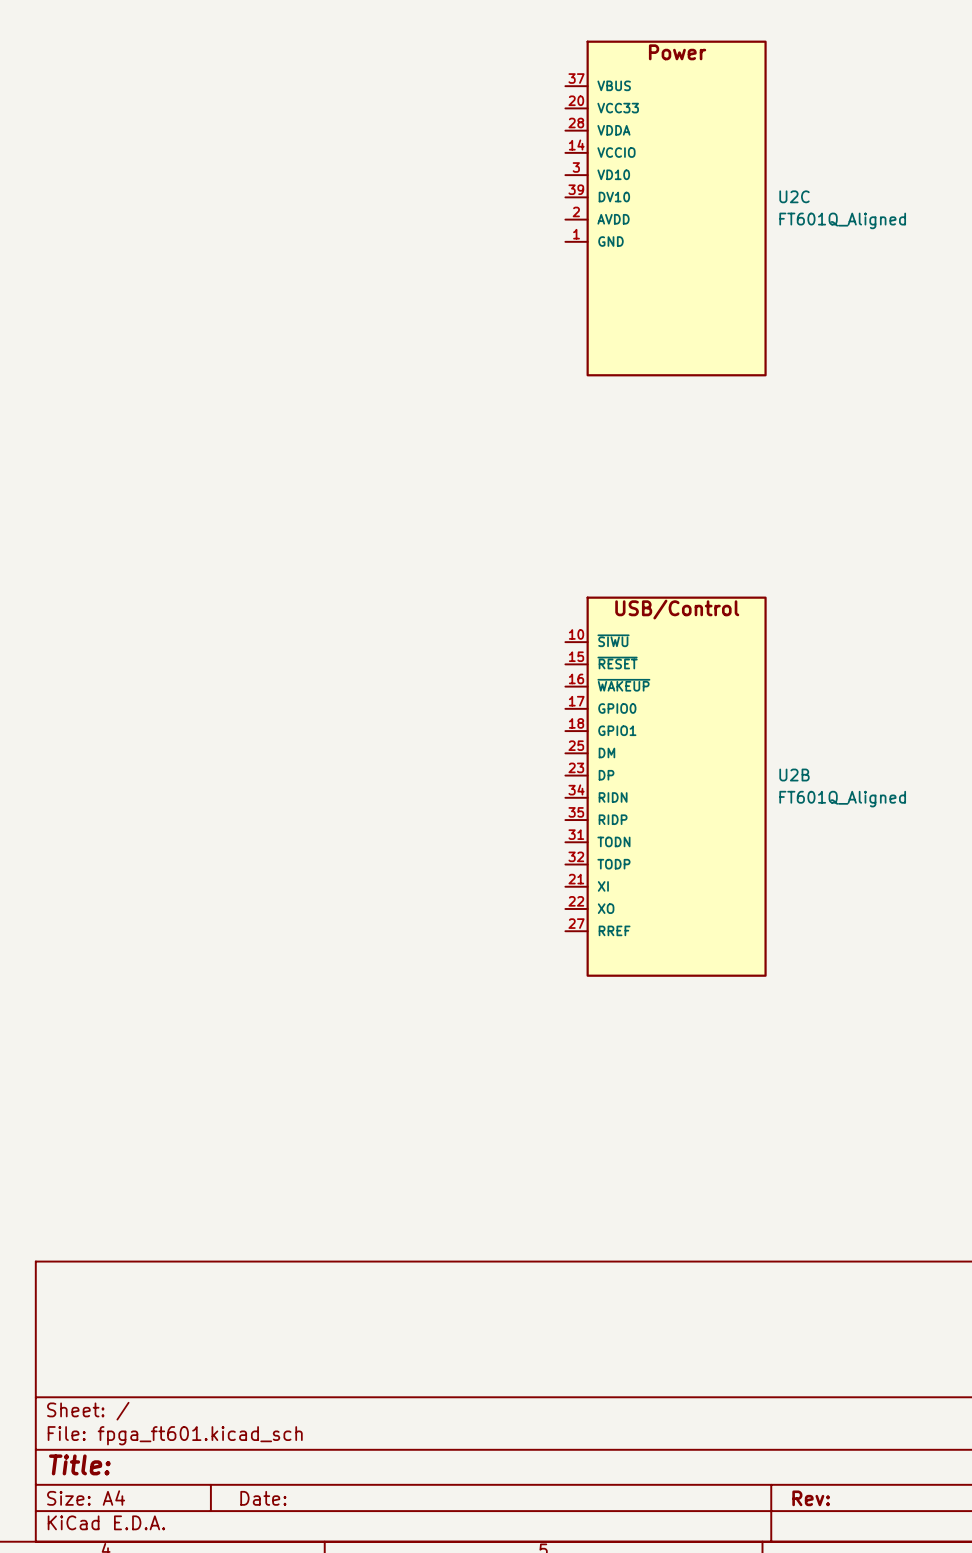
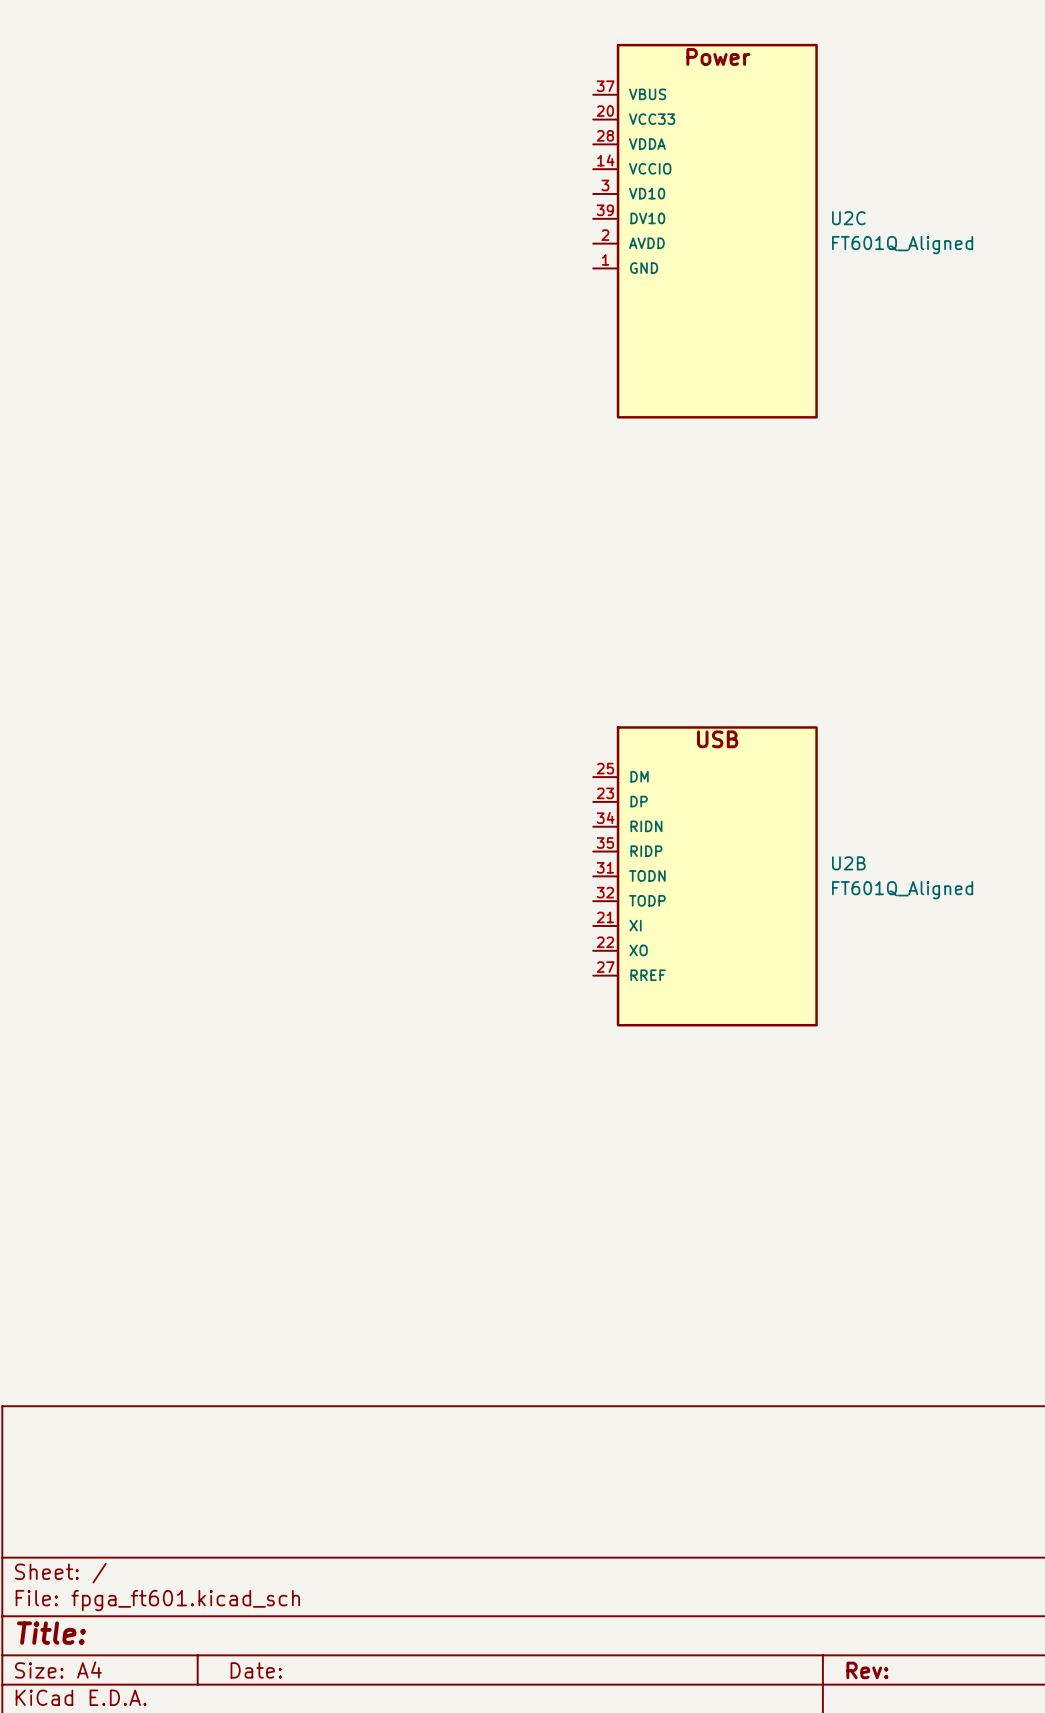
U2B symbol: [565, 596, 767, 977] -> [593, 726, 818, 1027]

